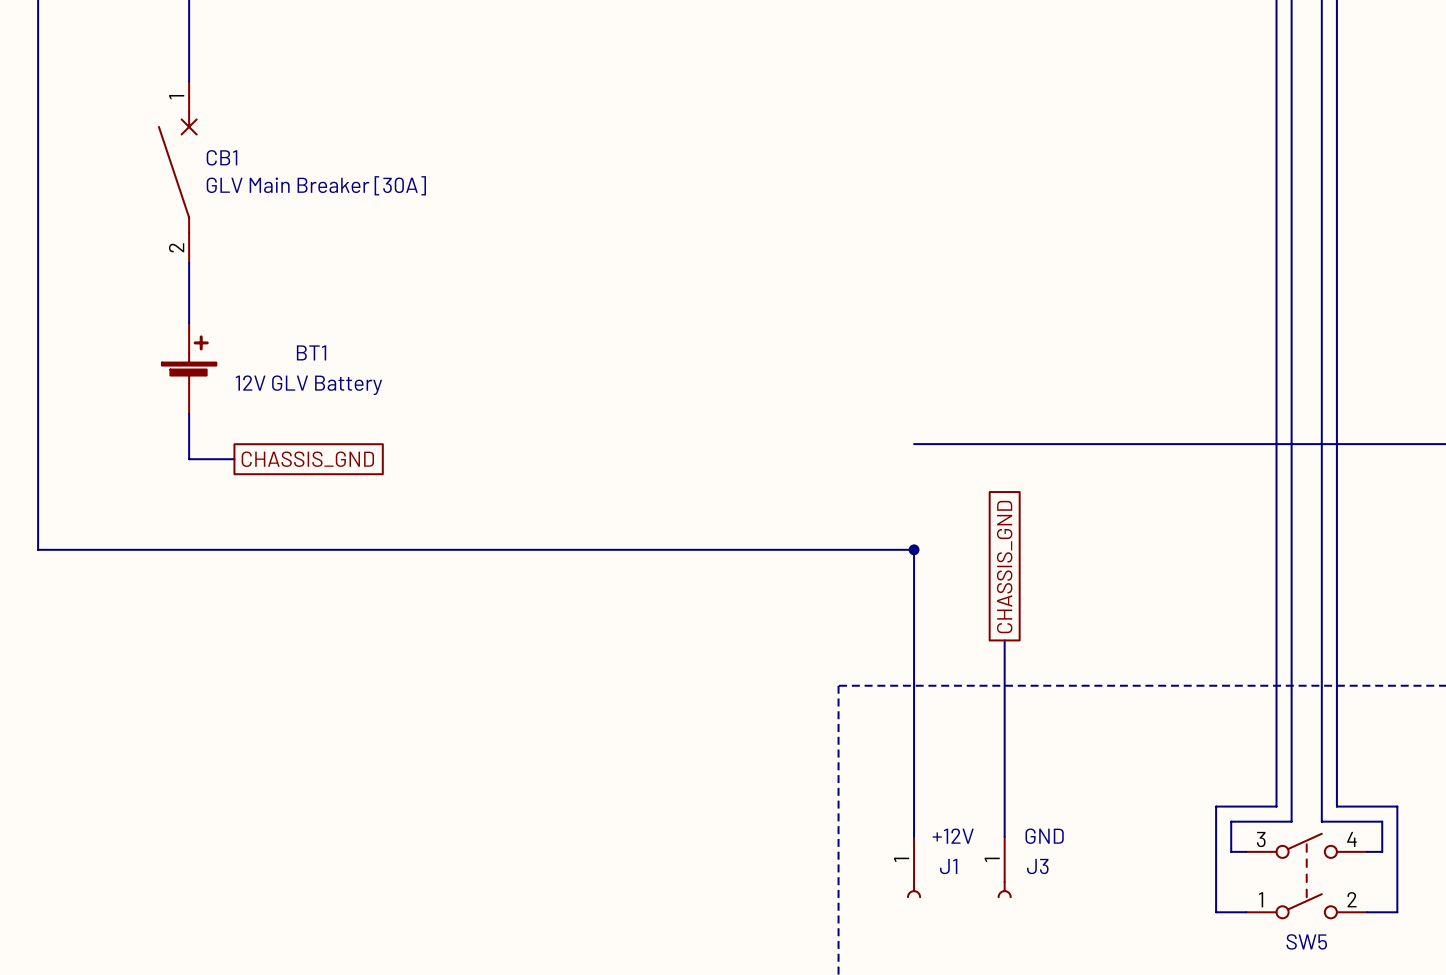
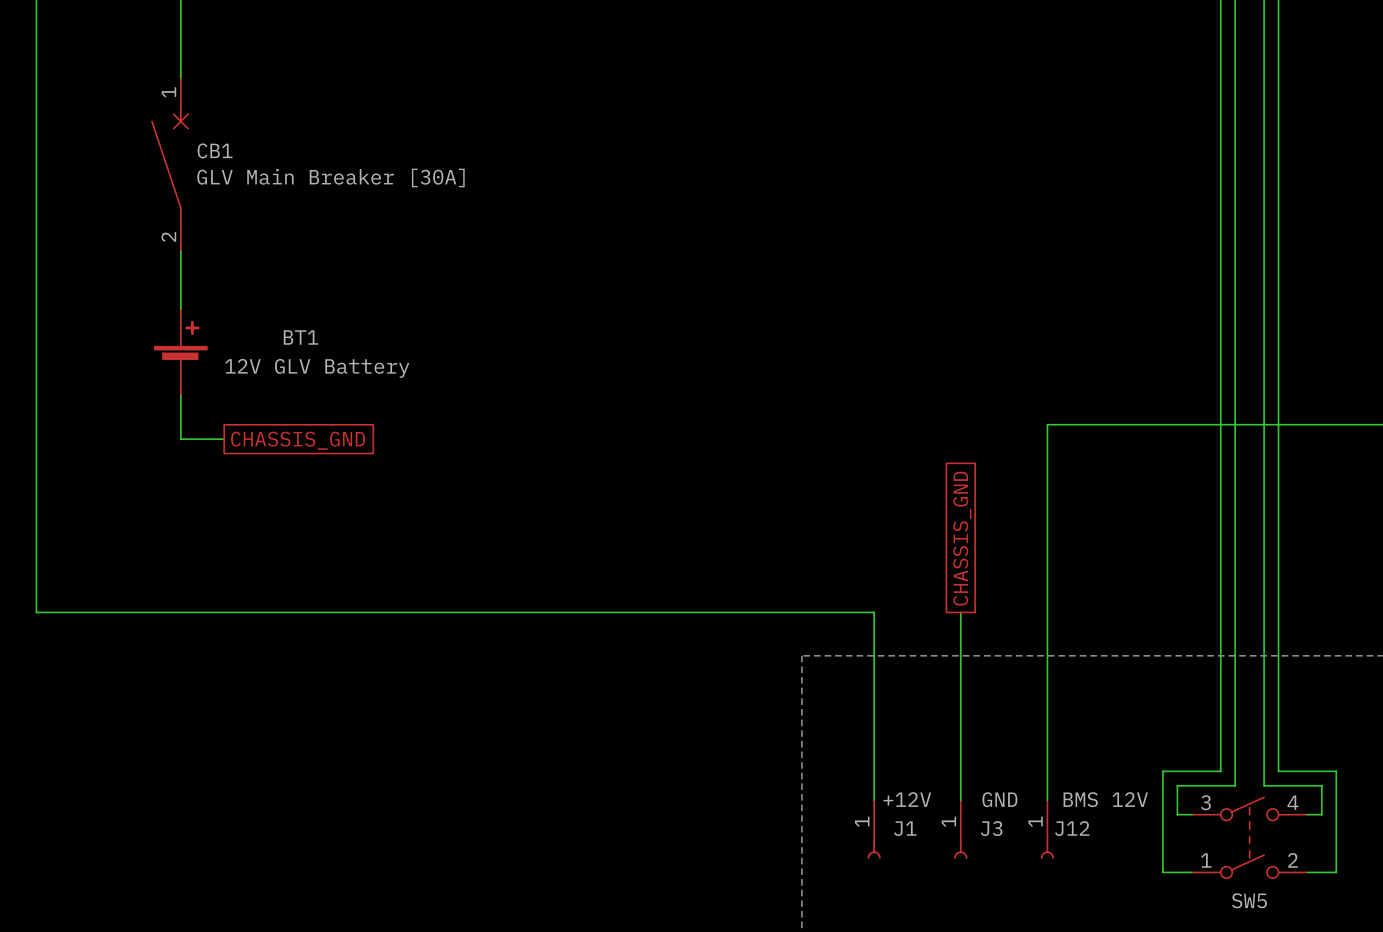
wire: (914, 444) (1095, 444) -> (1047, 800) (1047, 424)
wire: (38, 549) (914, 549) (914, 640) -> (36, 525) (36, 612) (874, 612)
junction: (914, 549) -> none
J12: none -> BMS 12V (1047, 829)

